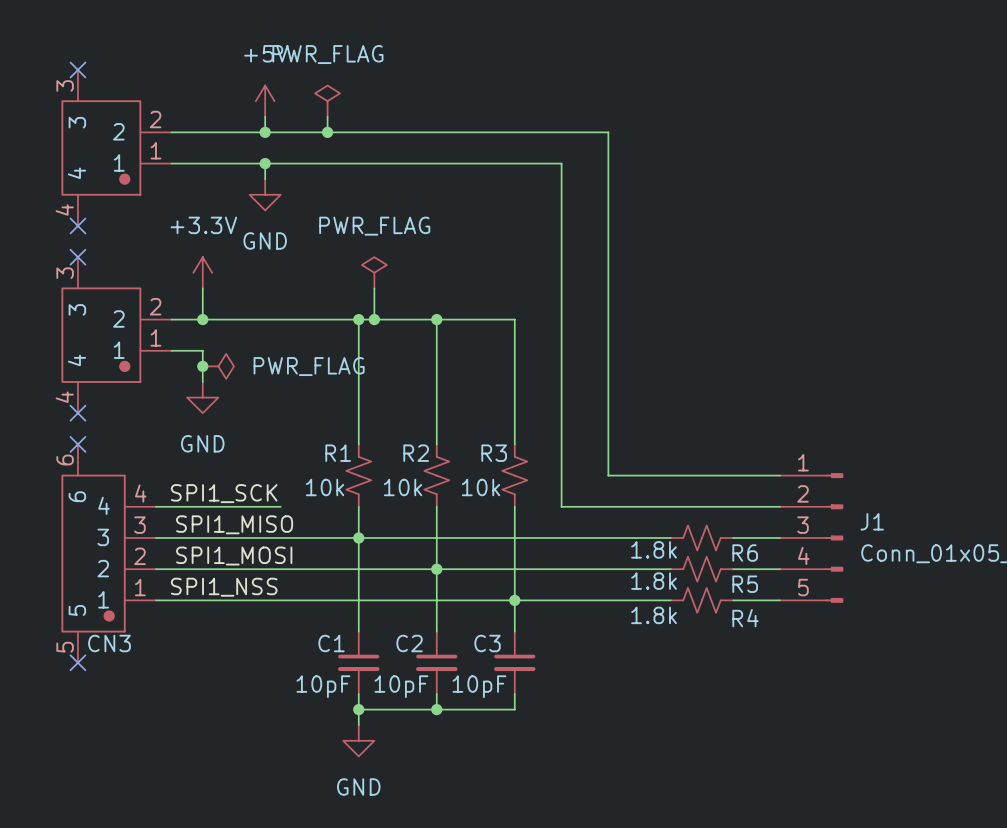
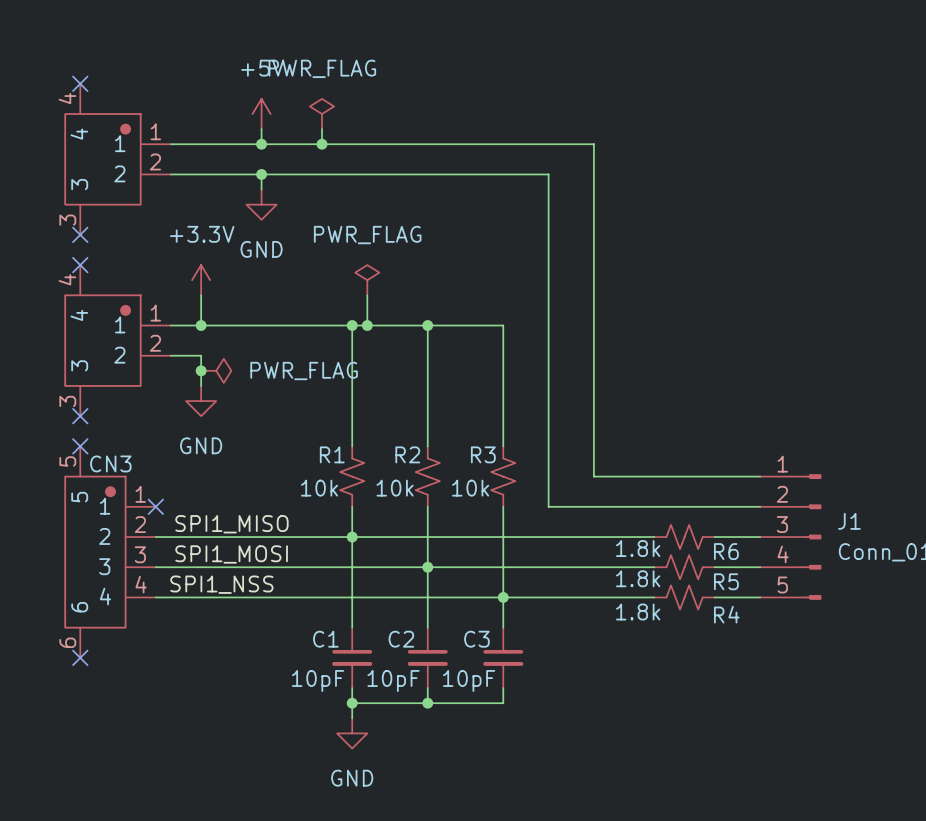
part flip: as is (101, 147) -> up-down (102, 159)
part flip: as is (101, 335) -> up-down (102, 340)
label: SPI1_SCK (224, 493) -> none
wire: (155, 506) (280, 506) -> none
no-connect mark: none -> (155, 506)
CN3 flip: as is (93, 553) -> up-down (95, 552)

